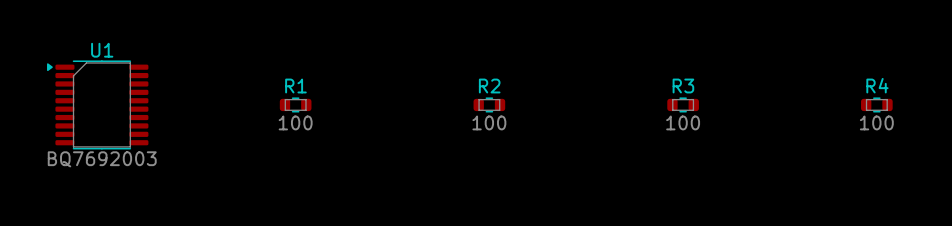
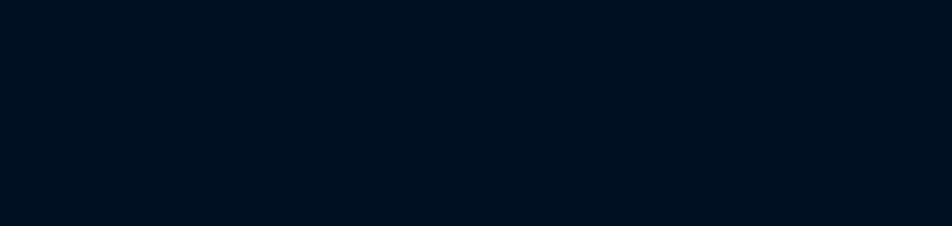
U1: BQ7692003 (97, 104) -> none
R1: 100 (295, 104) -> none
R2: 100 (489, 104) -> none
R3: 100 (683, 104) -> none
R4: 100 (876, 104) -> none

